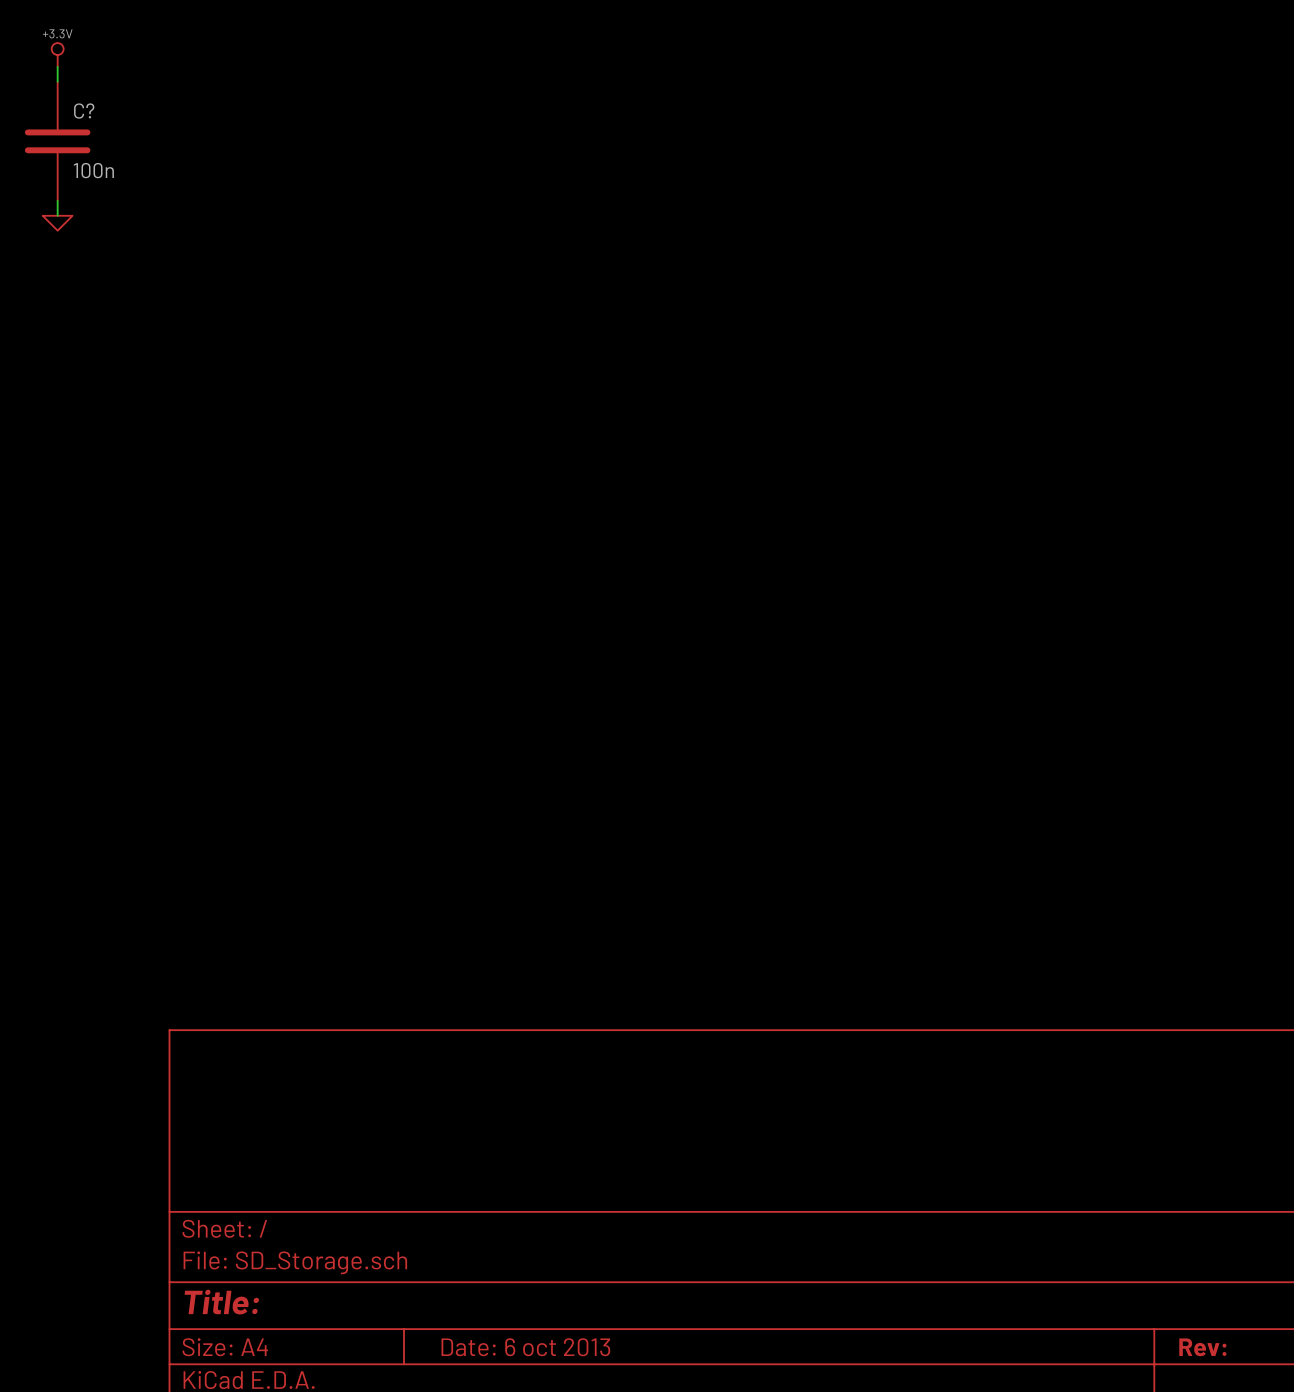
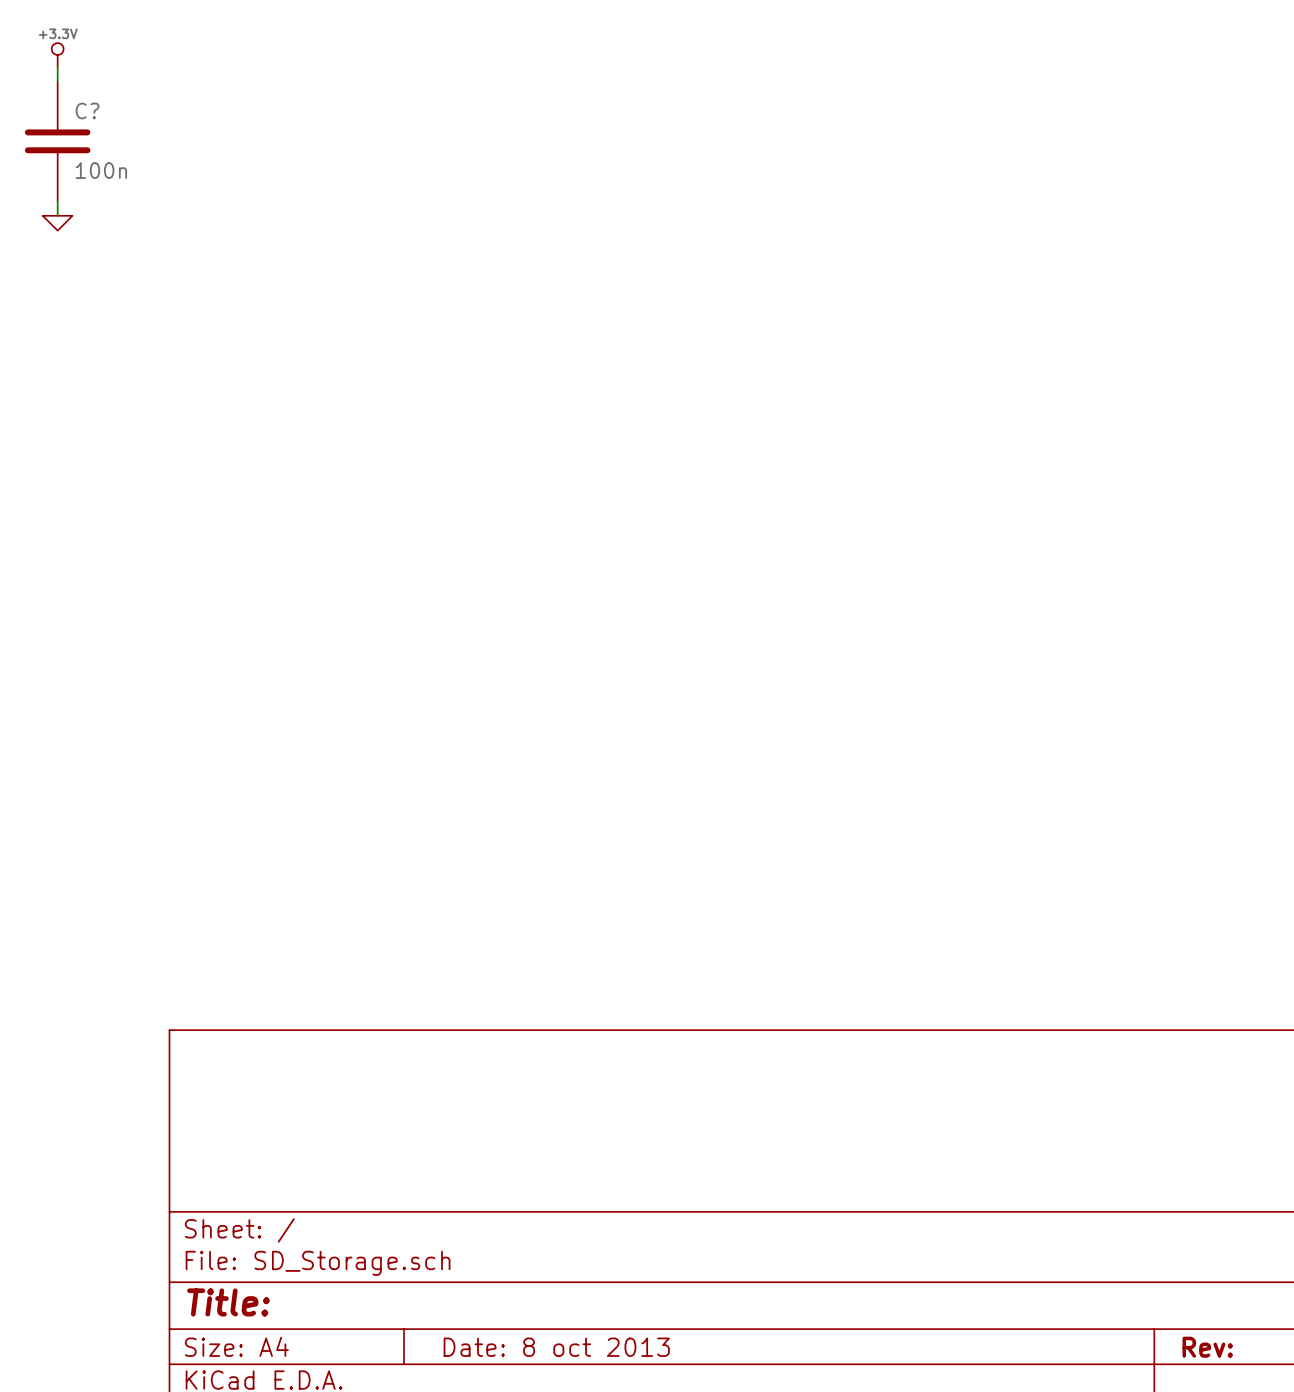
title block: Date: 6 oct 2013 (525, 1347) -> Date: 8 oct 2013 (556, 1347)

